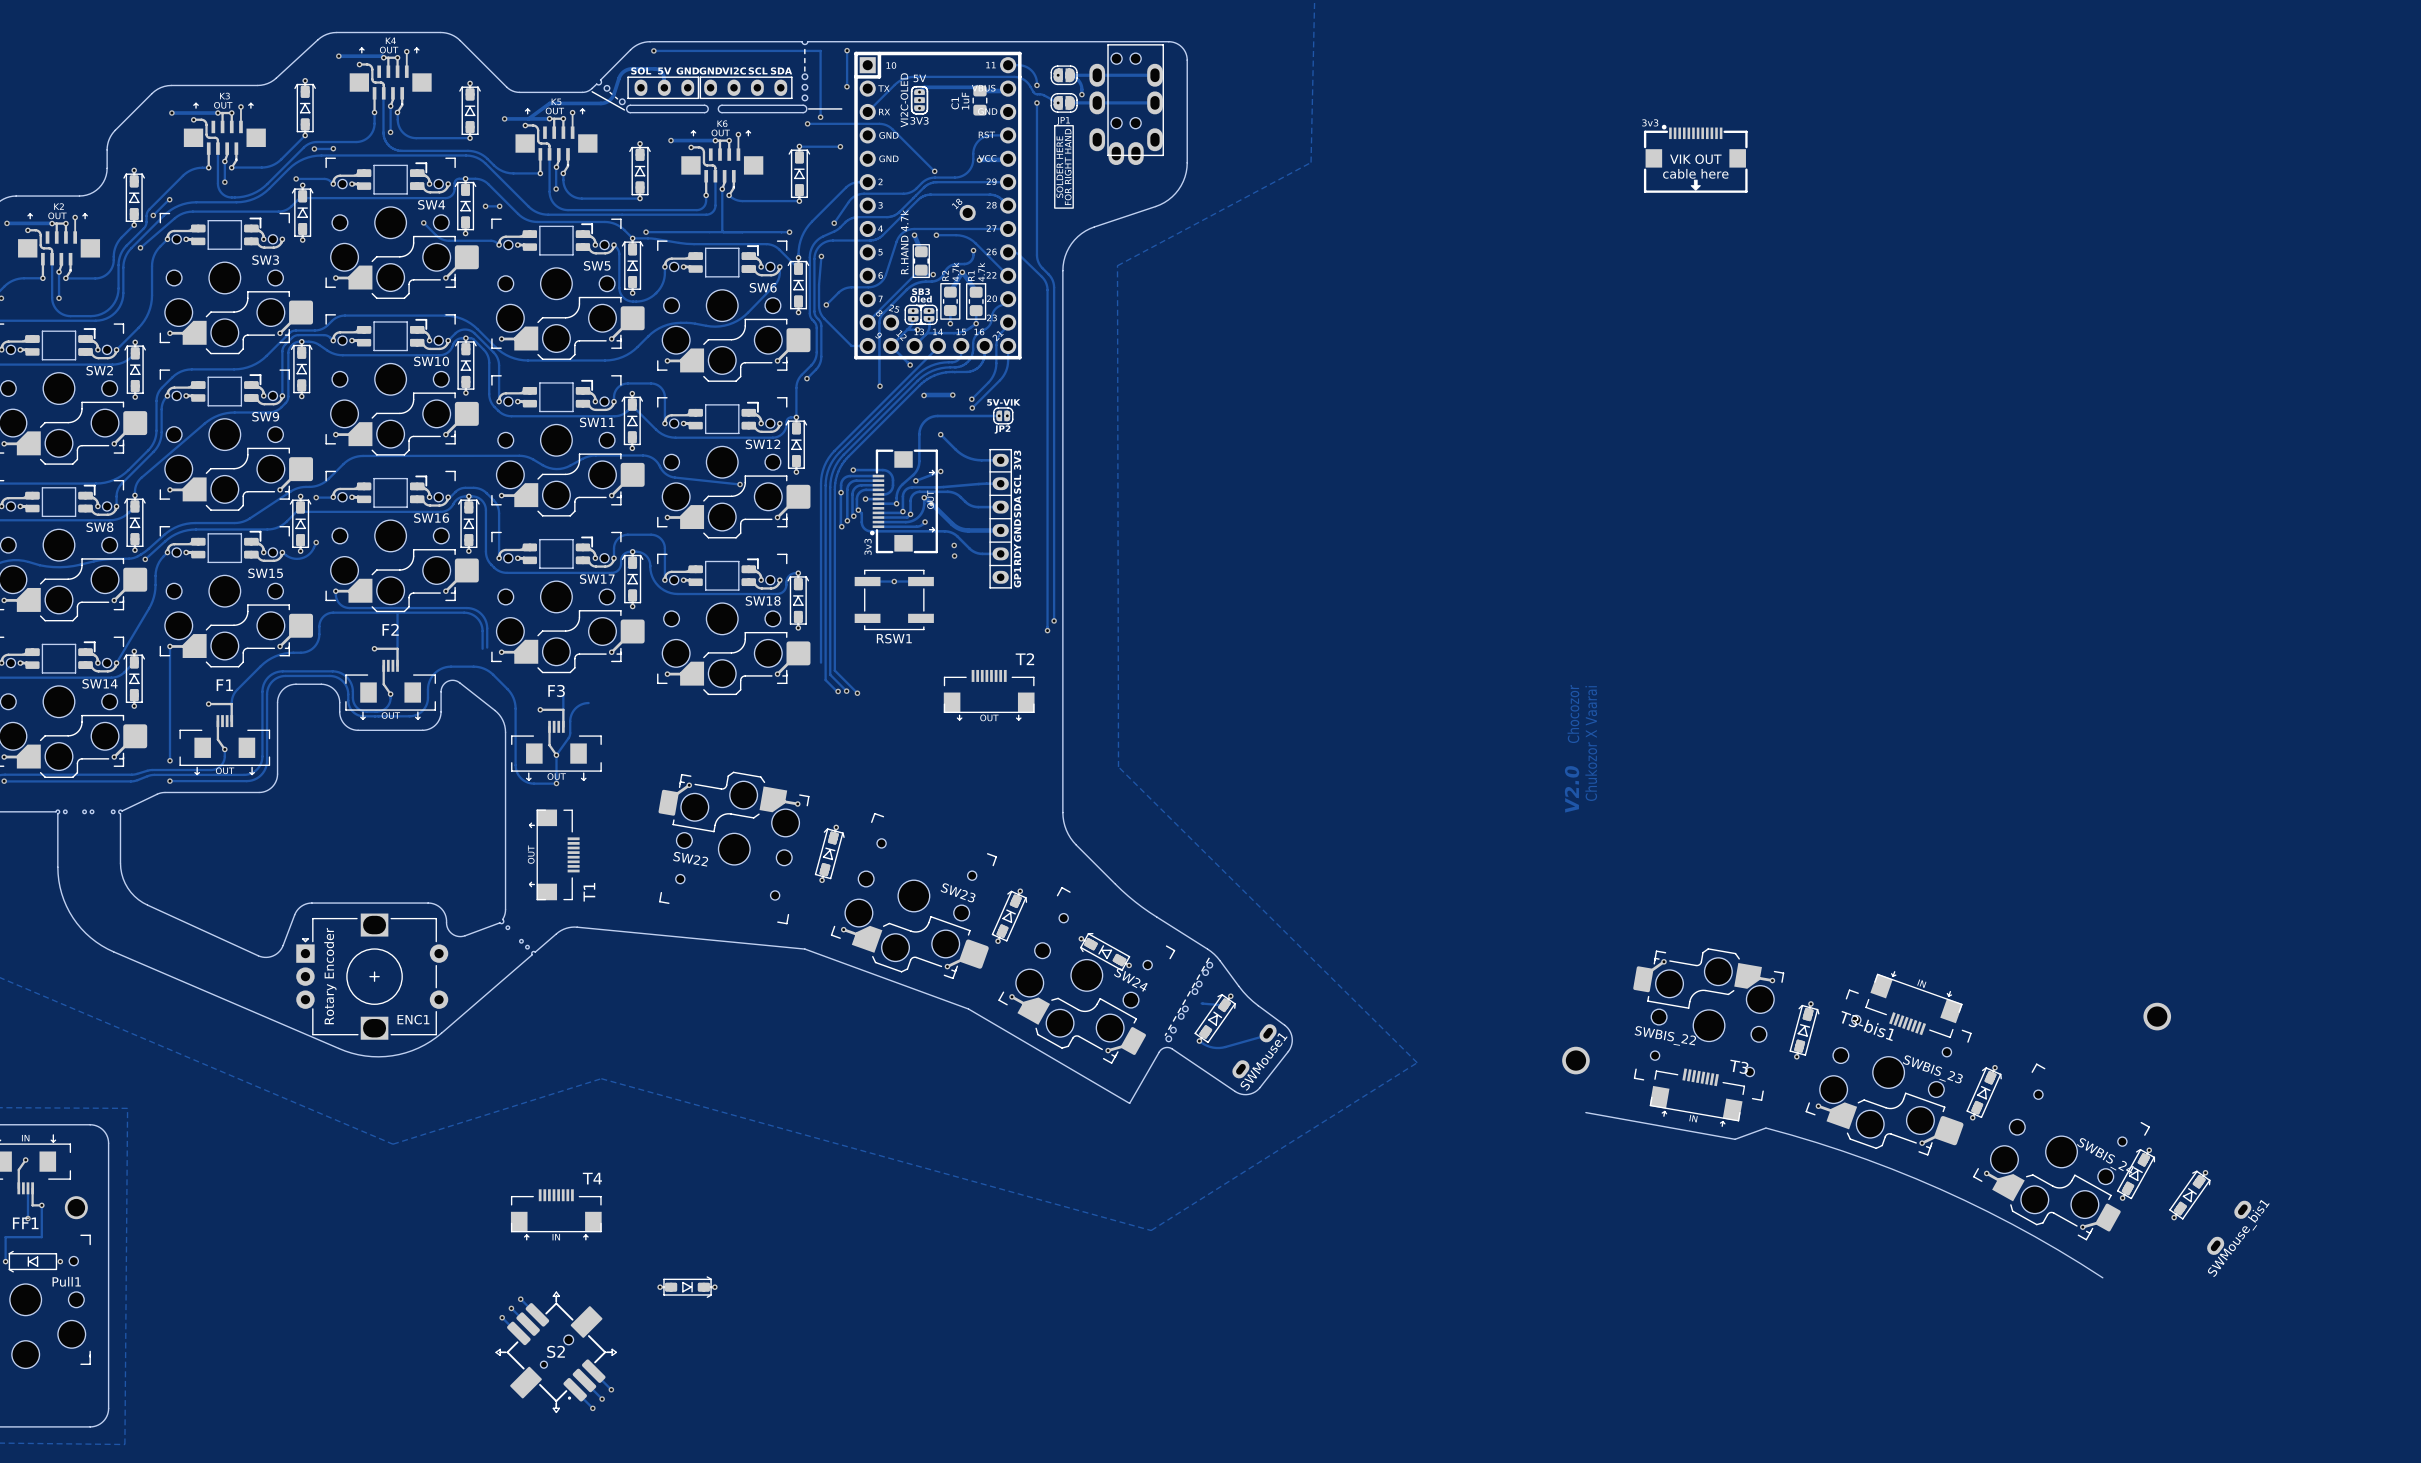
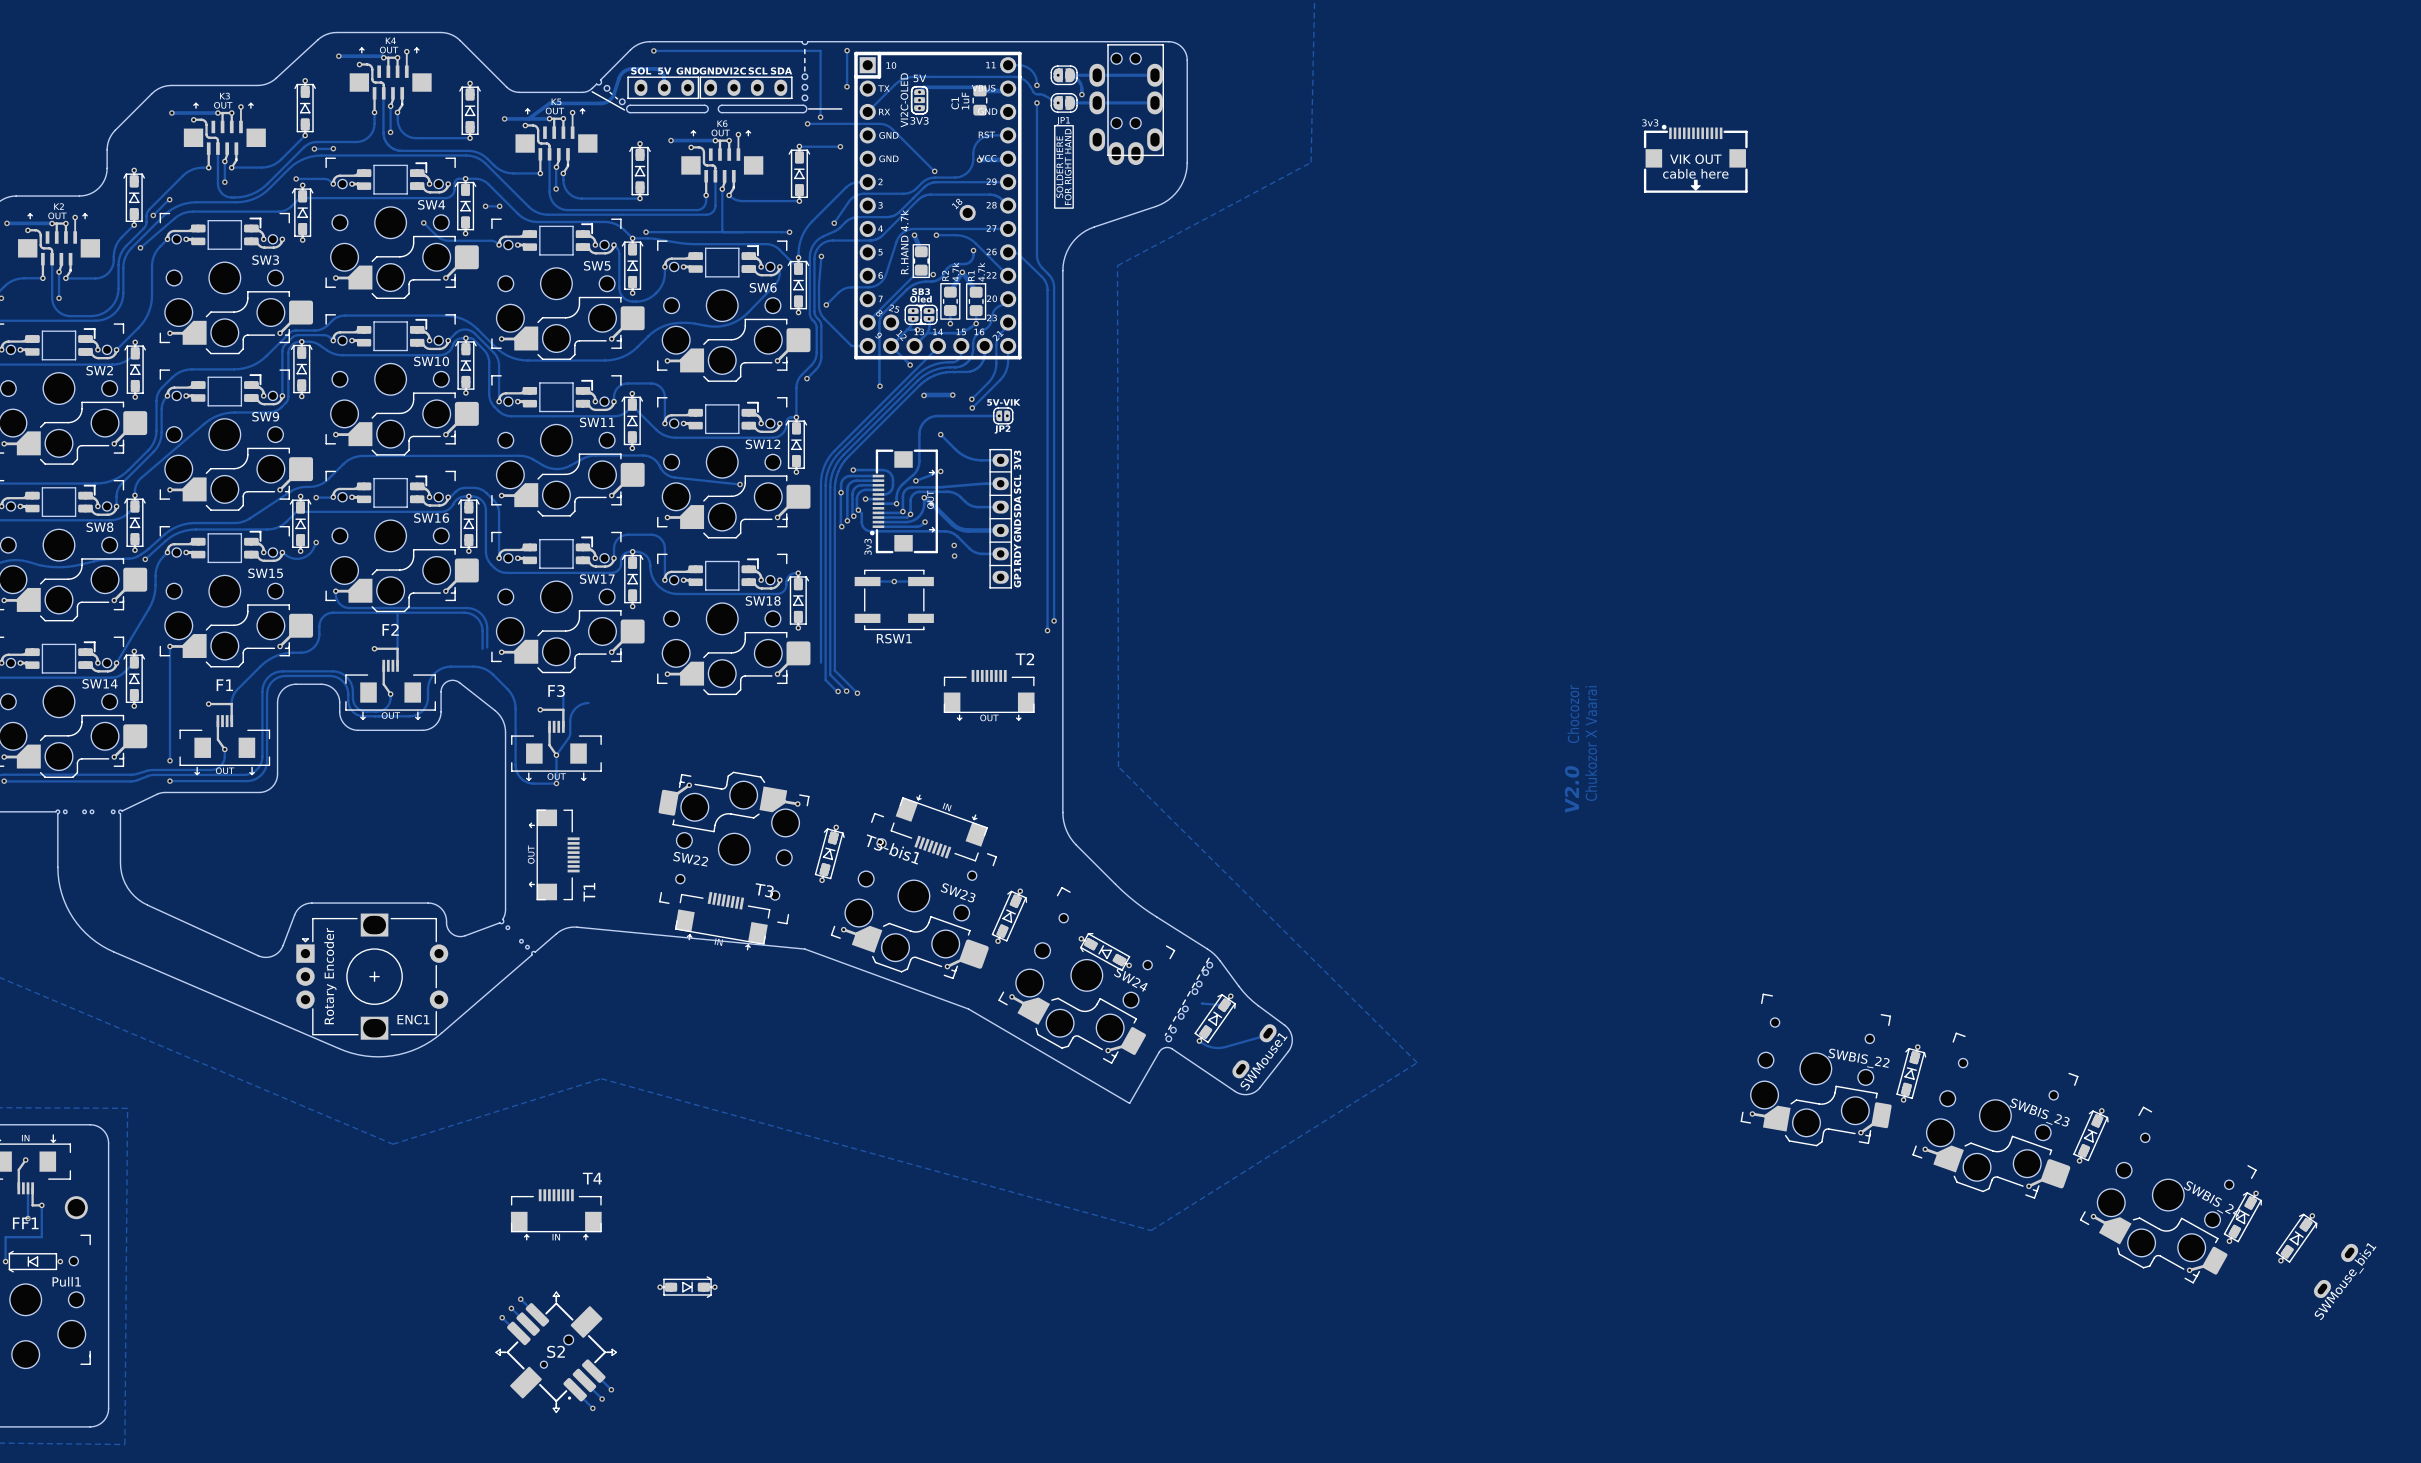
T3-bis1 position: (1914, 1004) -> (939, 828)
part: (2157, 1016) -> none
SWBIS_22 rotation: 0° (1708, 1024) -> 180° (1816, 1069)
SWBIS_22 position: (1708, 1024) -> (1816, 1069)
part position: (1804, 1030) -> (1911, 1073)
part: (1575, 1060) -> none
SWBIS_23 position: (1888, 1072) -> (1995, 1115)
part position: (1984, 1092) -> (2090, 1135)
T3 position: (1697, 1097) -> (722, 921)
board edge: (1585, 1112) (1735, 1139) (1765, 1128) -> none
board edge: (1765, 1128) (1841, 1150) (1940, 1189) (2011, 1224) (2102, 1277) -> none
SWBIS_24 position: (2061, 1151) -> (2168, 1195)
part position: (2135, 1174) -> (2242, 1217)
part position: (2189, 1195) -> (2296, 1238)
SWMouse_bis1 position: (2229, 1227) -> (2336, 1270)

